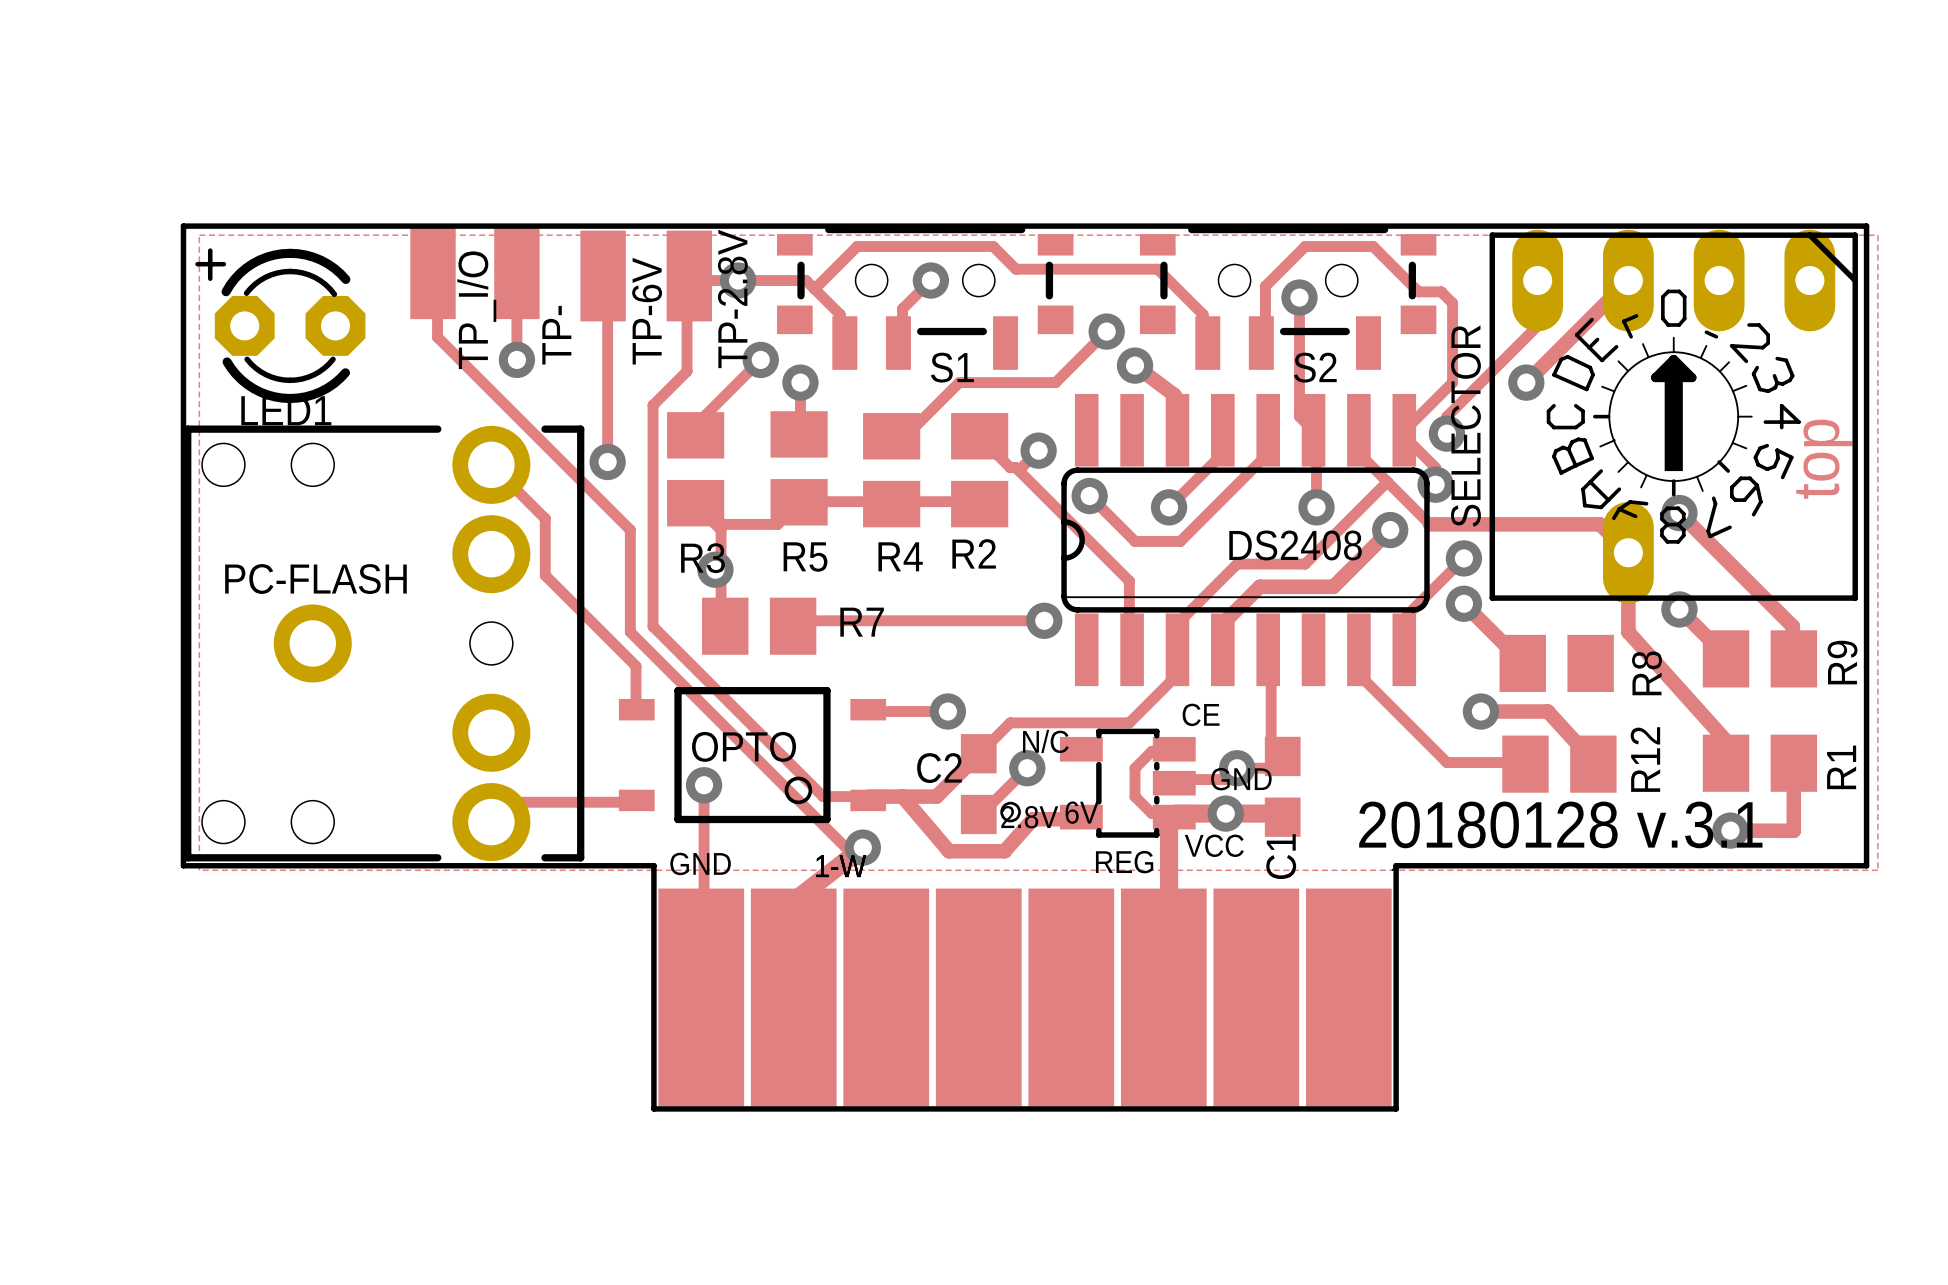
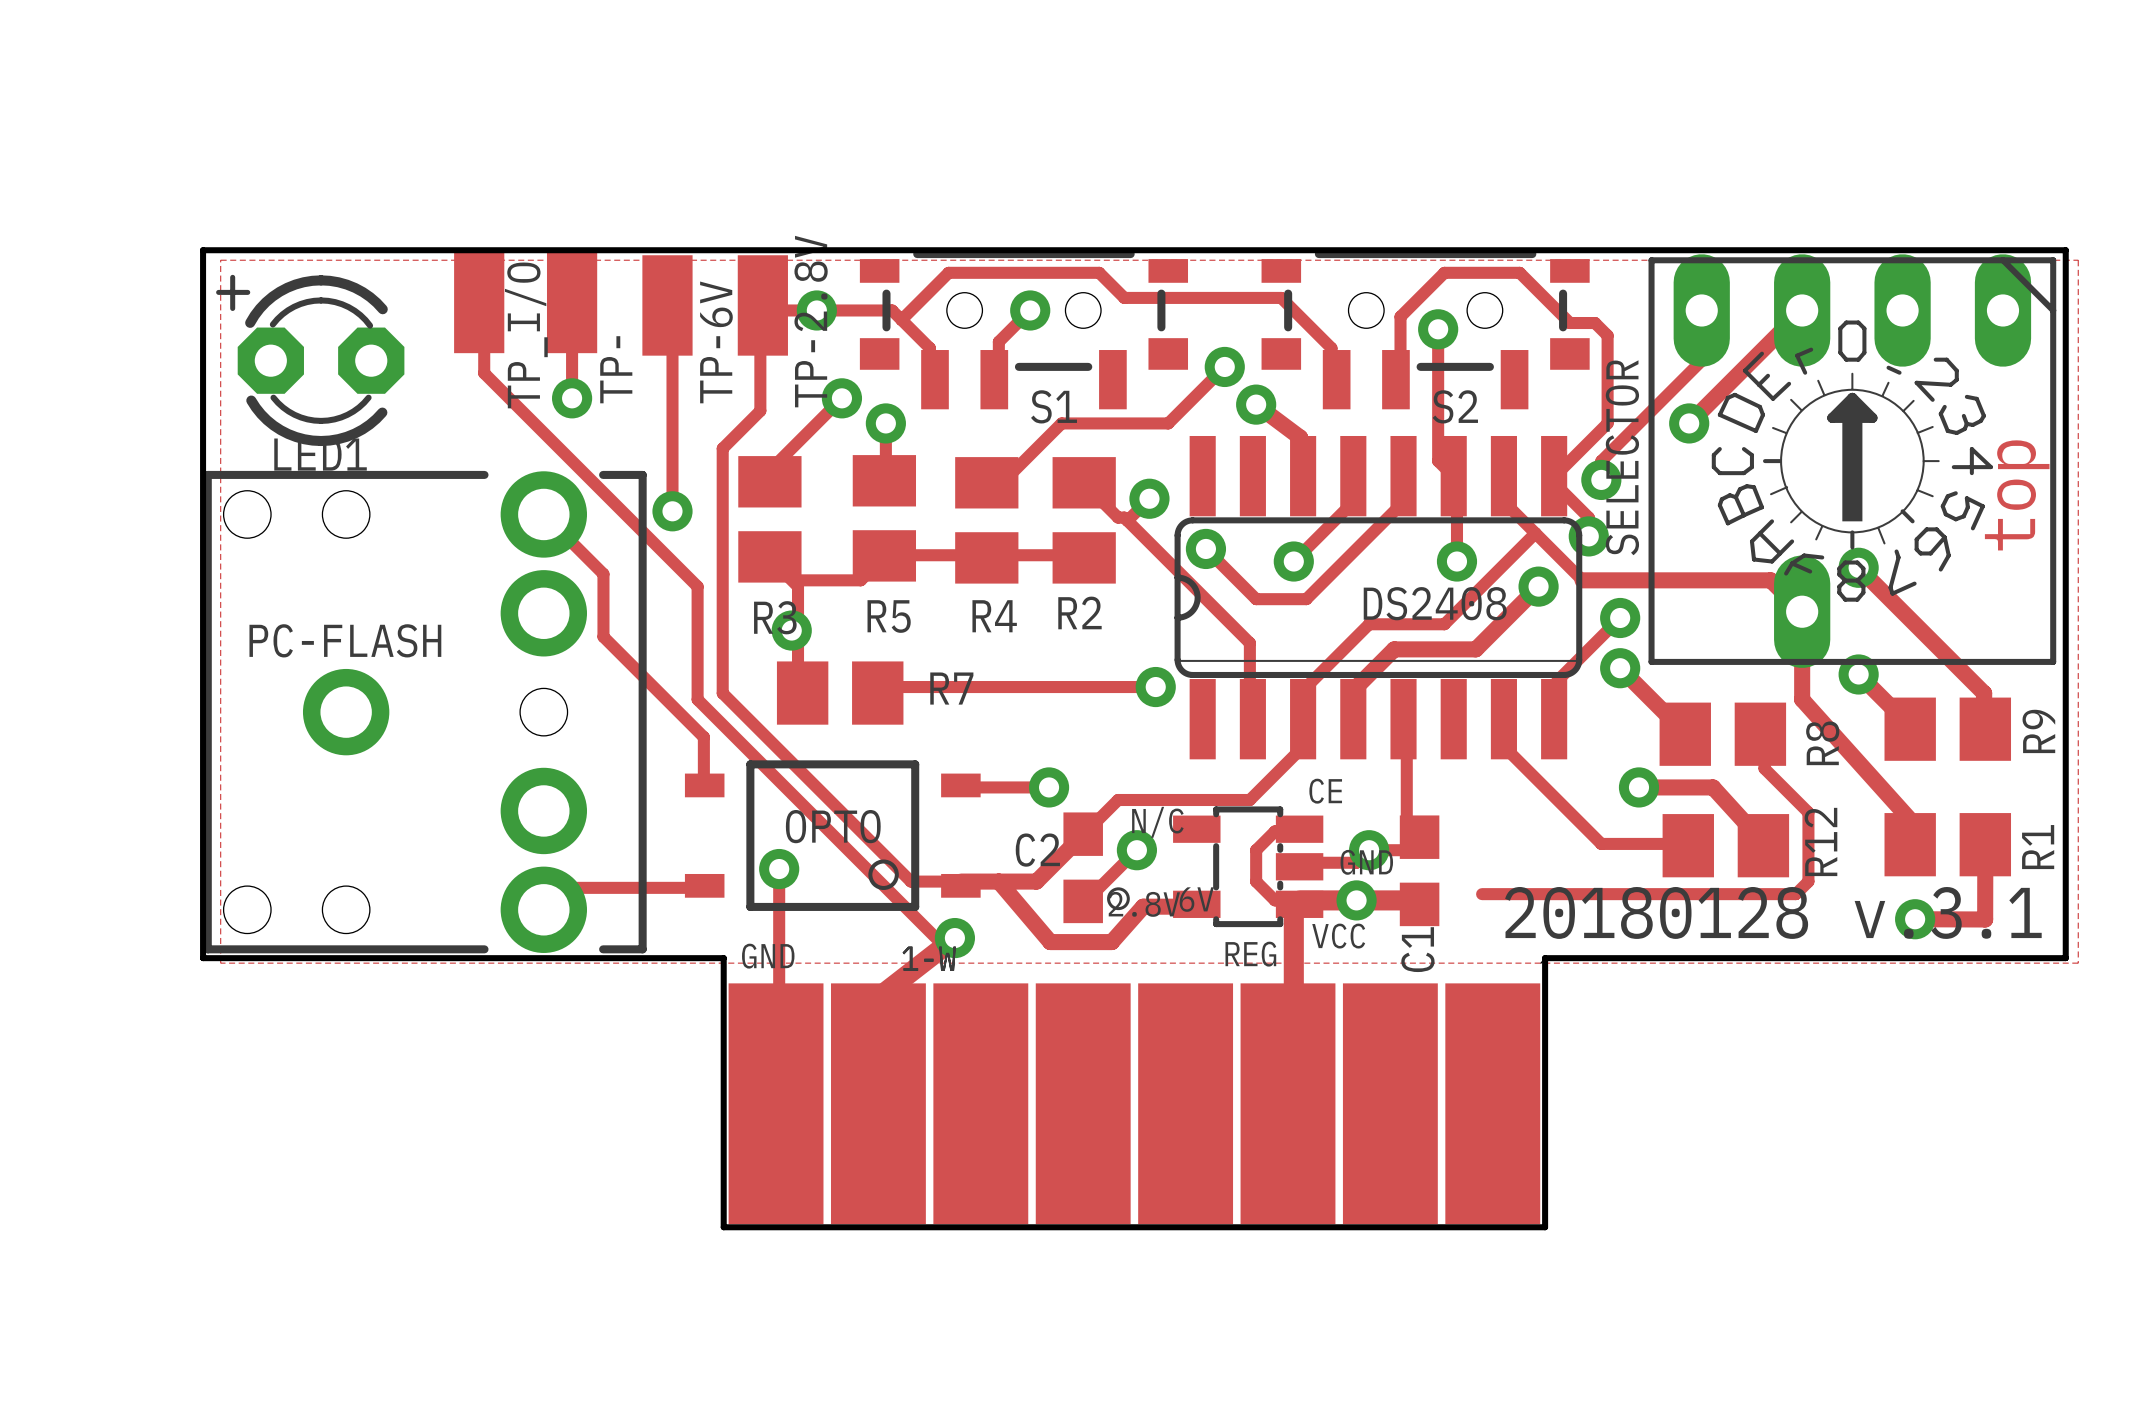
track: none -> (1760, 734) (1764, 737) (1764, 768) (1808, 812) (1808, 881) (1795, 894) (1482, 894)

